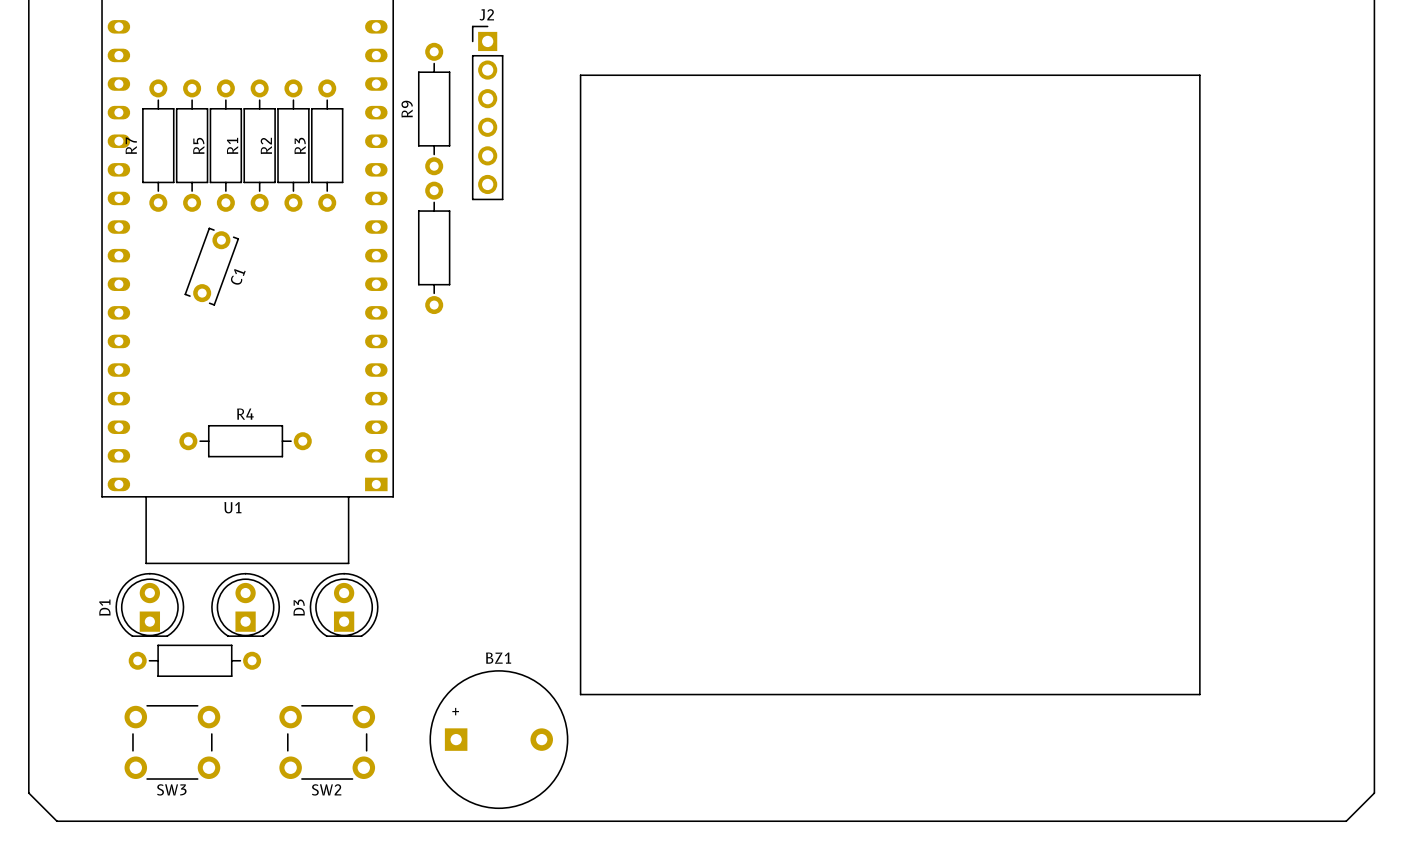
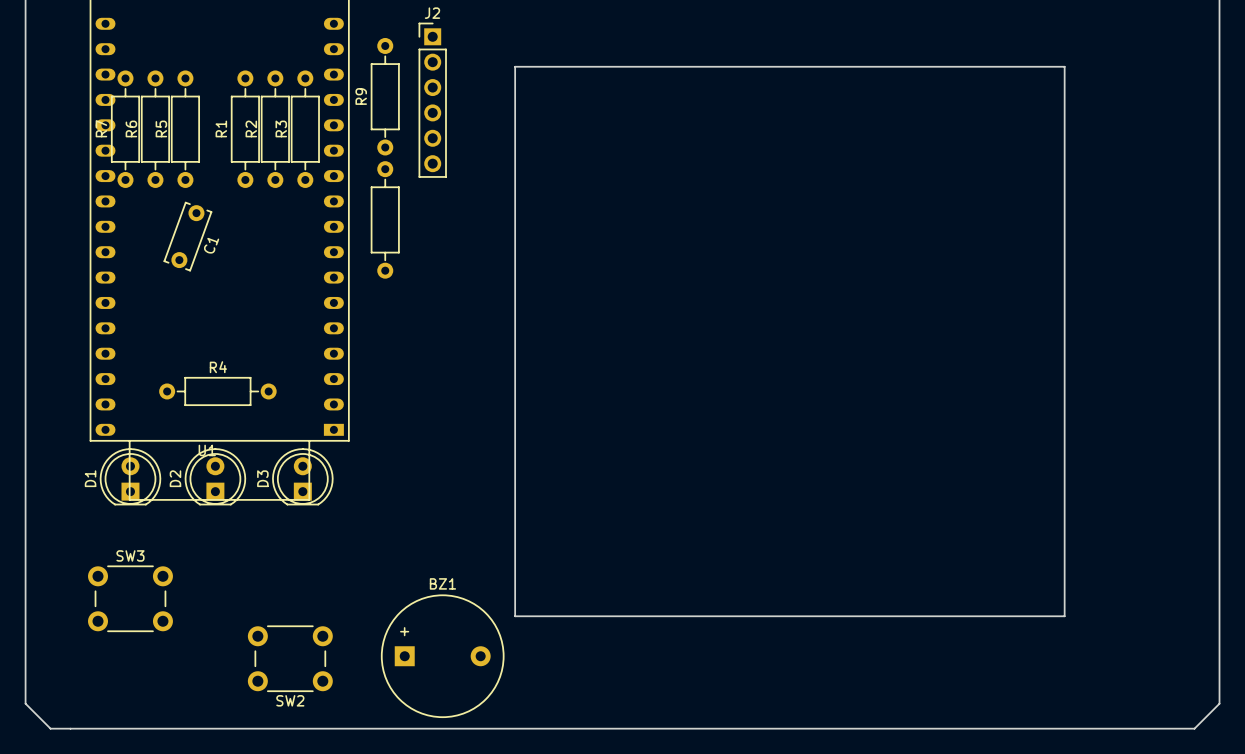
R7 position: (158, 145) -> (125, 129)
R6: none -> (155, 129)
part: (192, 145) -> none
R5 position: (225, 145) -> (185, 129)
R1 position: (259, 145) -> (245, 129)
R2 position: (293, 145) -> (275, 129)
R3 position: (327, 145) -> (305, 129)
D2: none -> (215, 476)
D1 position: (149, 604) -> (130, 476)
part: (245, 604) -> none
D3 position: (344, 604) -> (302, 476)
part: (194, 660) -> none
SW3 position: (172, 742) -> (130, 598)
SW3 name position: SW3 (171, 789) -> SW3 (130, 555)

